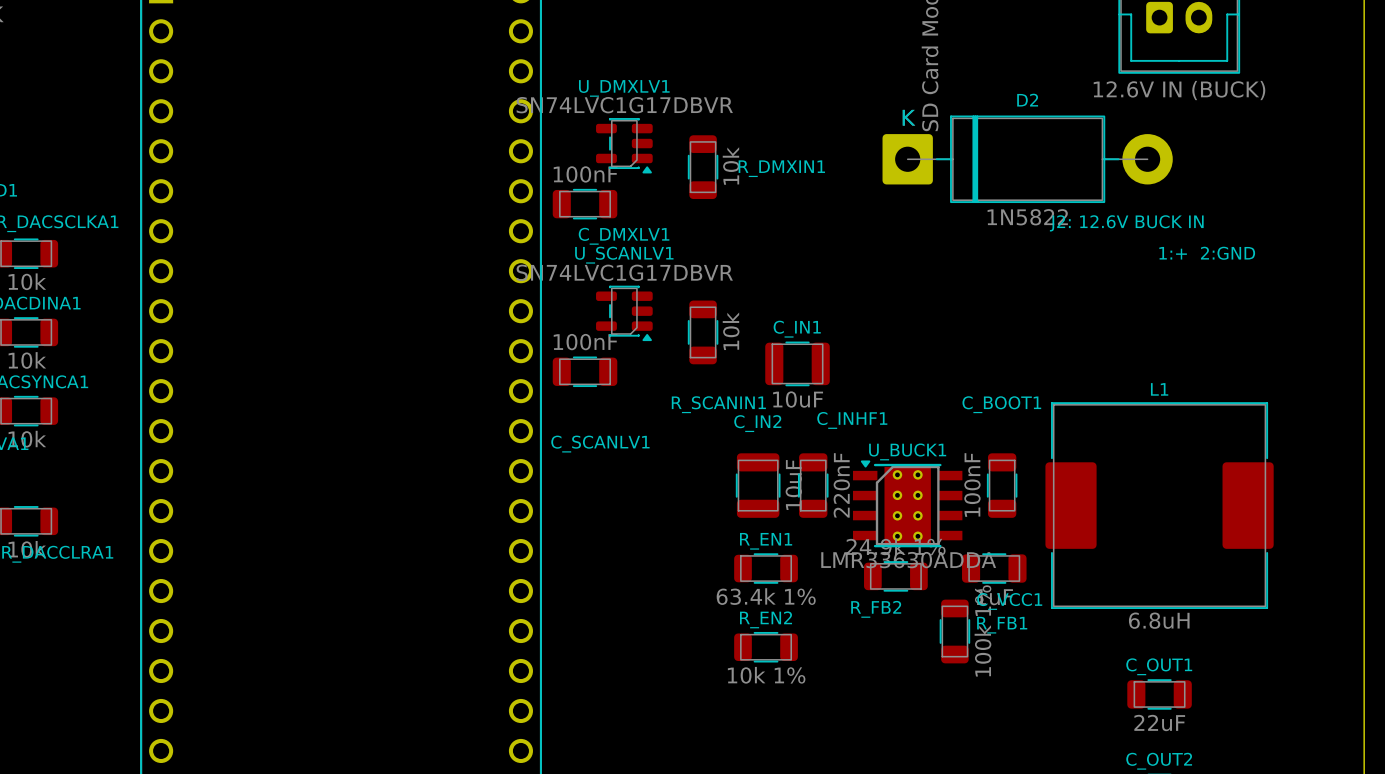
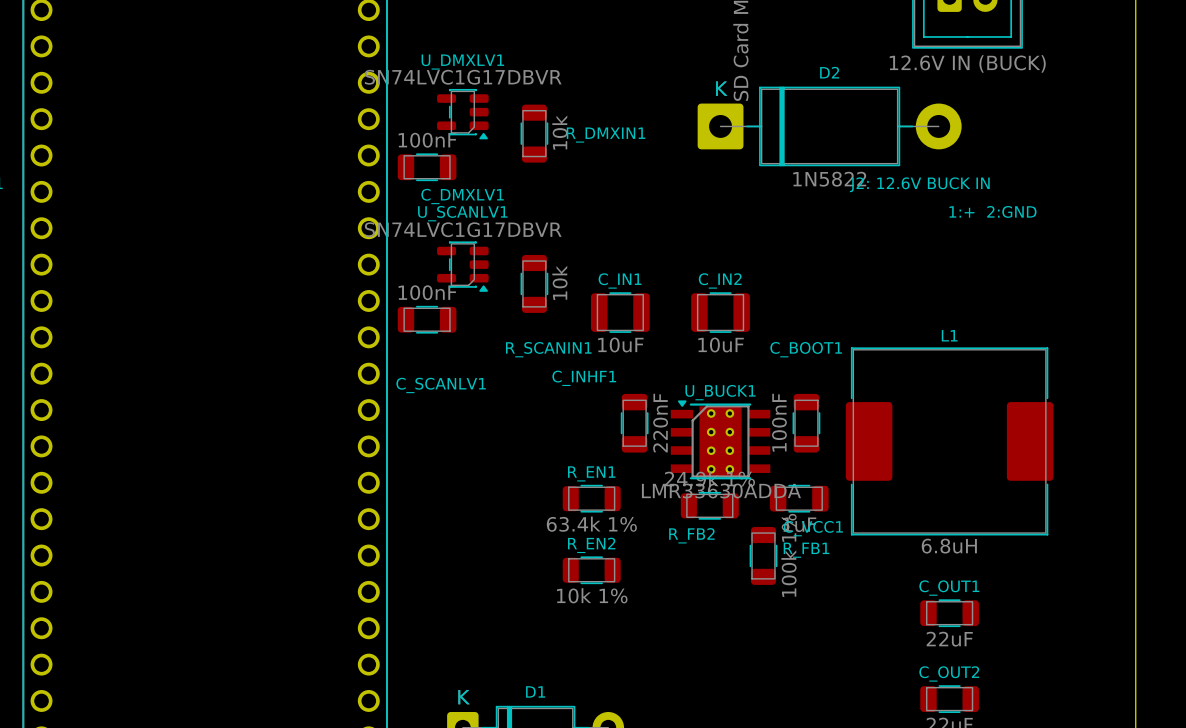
C_INHF1 name position: C_INHF1 (852, 420) -> C_INHF1 (584, 378)
C_IN2 rotation: 0° (758, 485) -> 90° clockwise (720, 312)
C_IN2 position: (758, 485) -> (720, 312)

